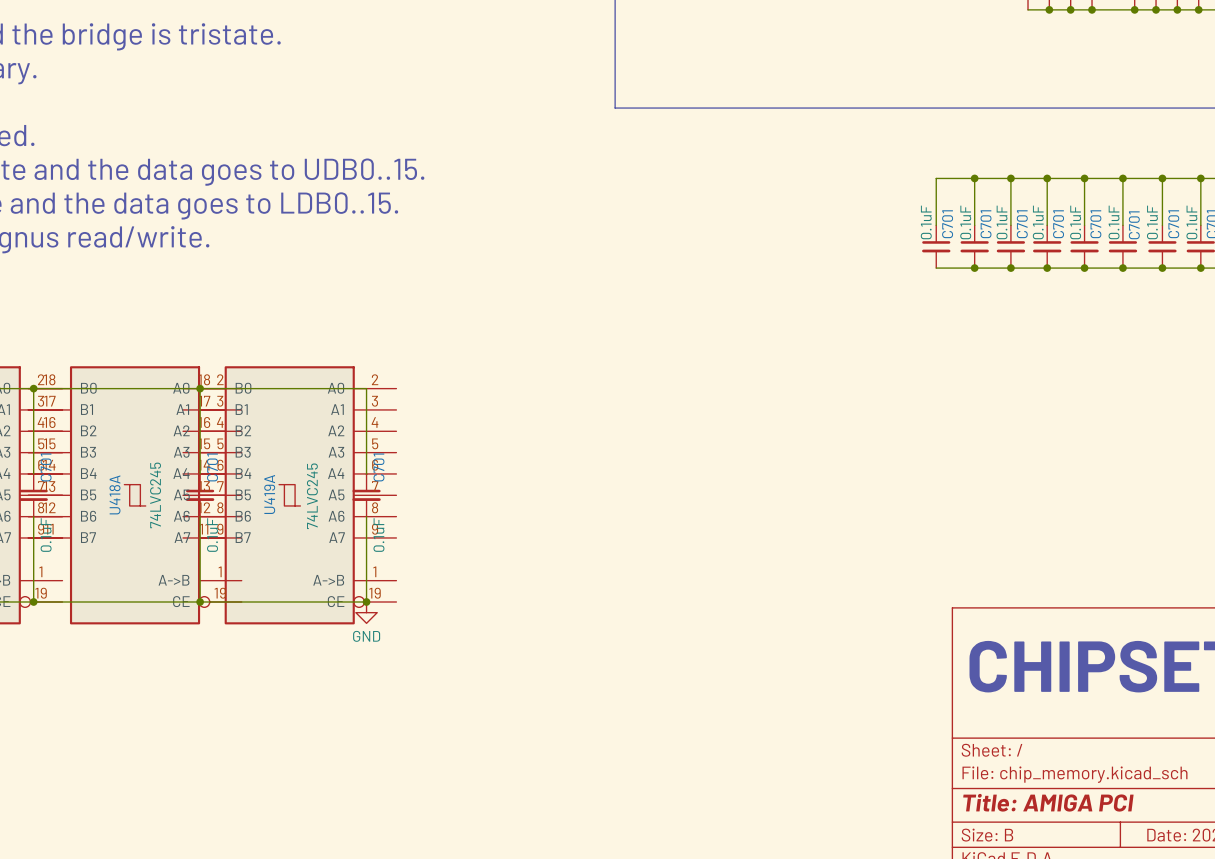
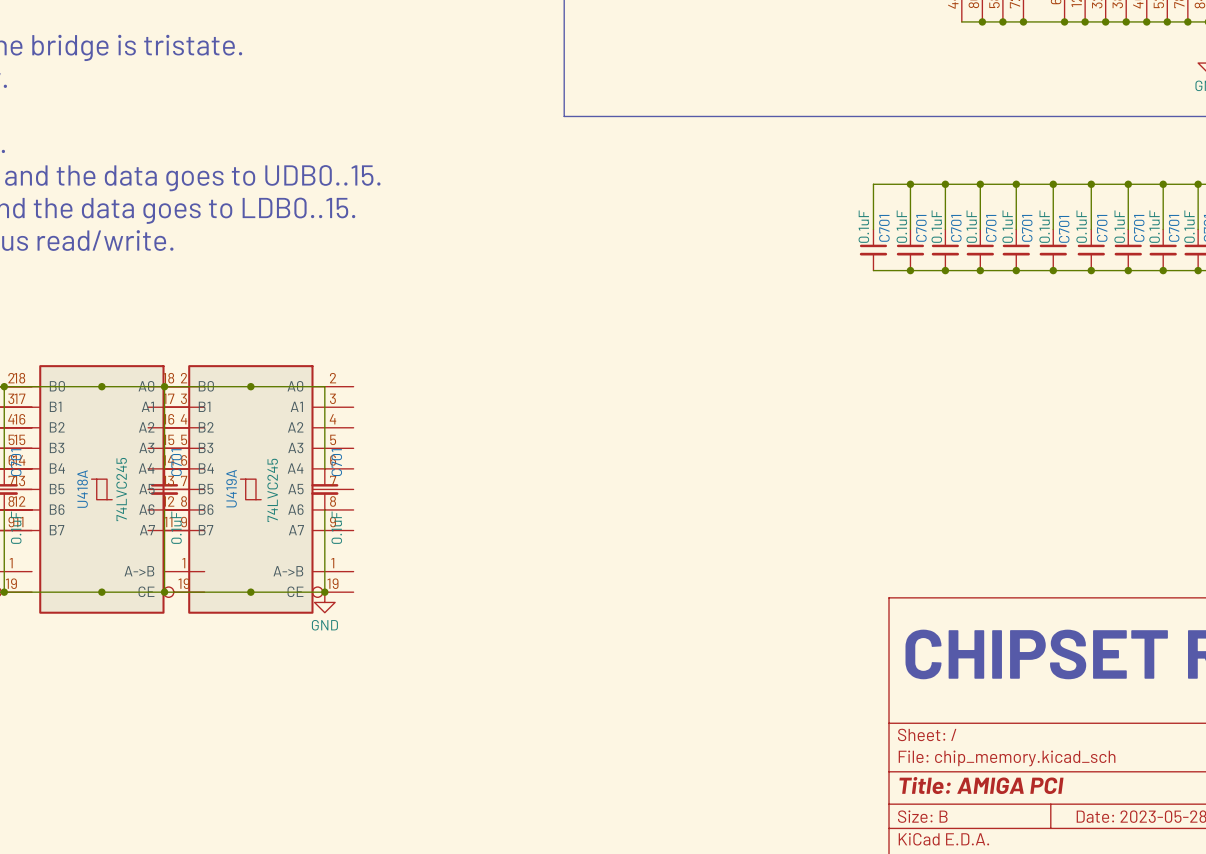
junction: none -> (101, 386)
junction: none -> (250, 386)
junction: none -> (101, 592)
junction: none -> (250, 592)

